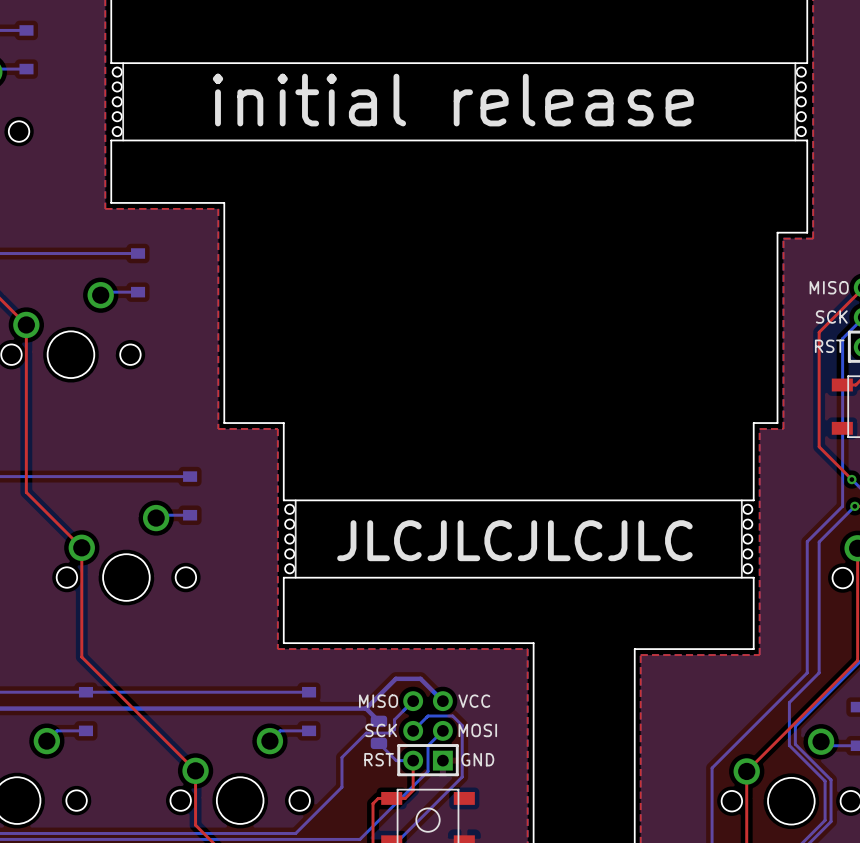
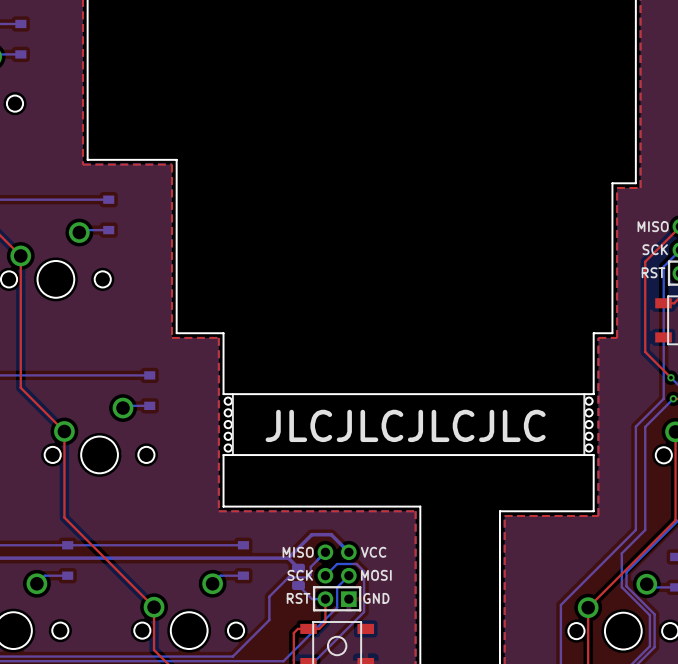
board edge: (111, 63) (807, 63) -> (87, 49) (87, 110)
line: (123, 63) (123, 140) -> none
line: (795, 63) (795, 140) -> none
text: initial release (453, 100) -> none
part: (117, 101) -> none
part: (801, 101) -> none
board edge: (111, 140) (807, 140) -> (635, 49) (635, 110)

